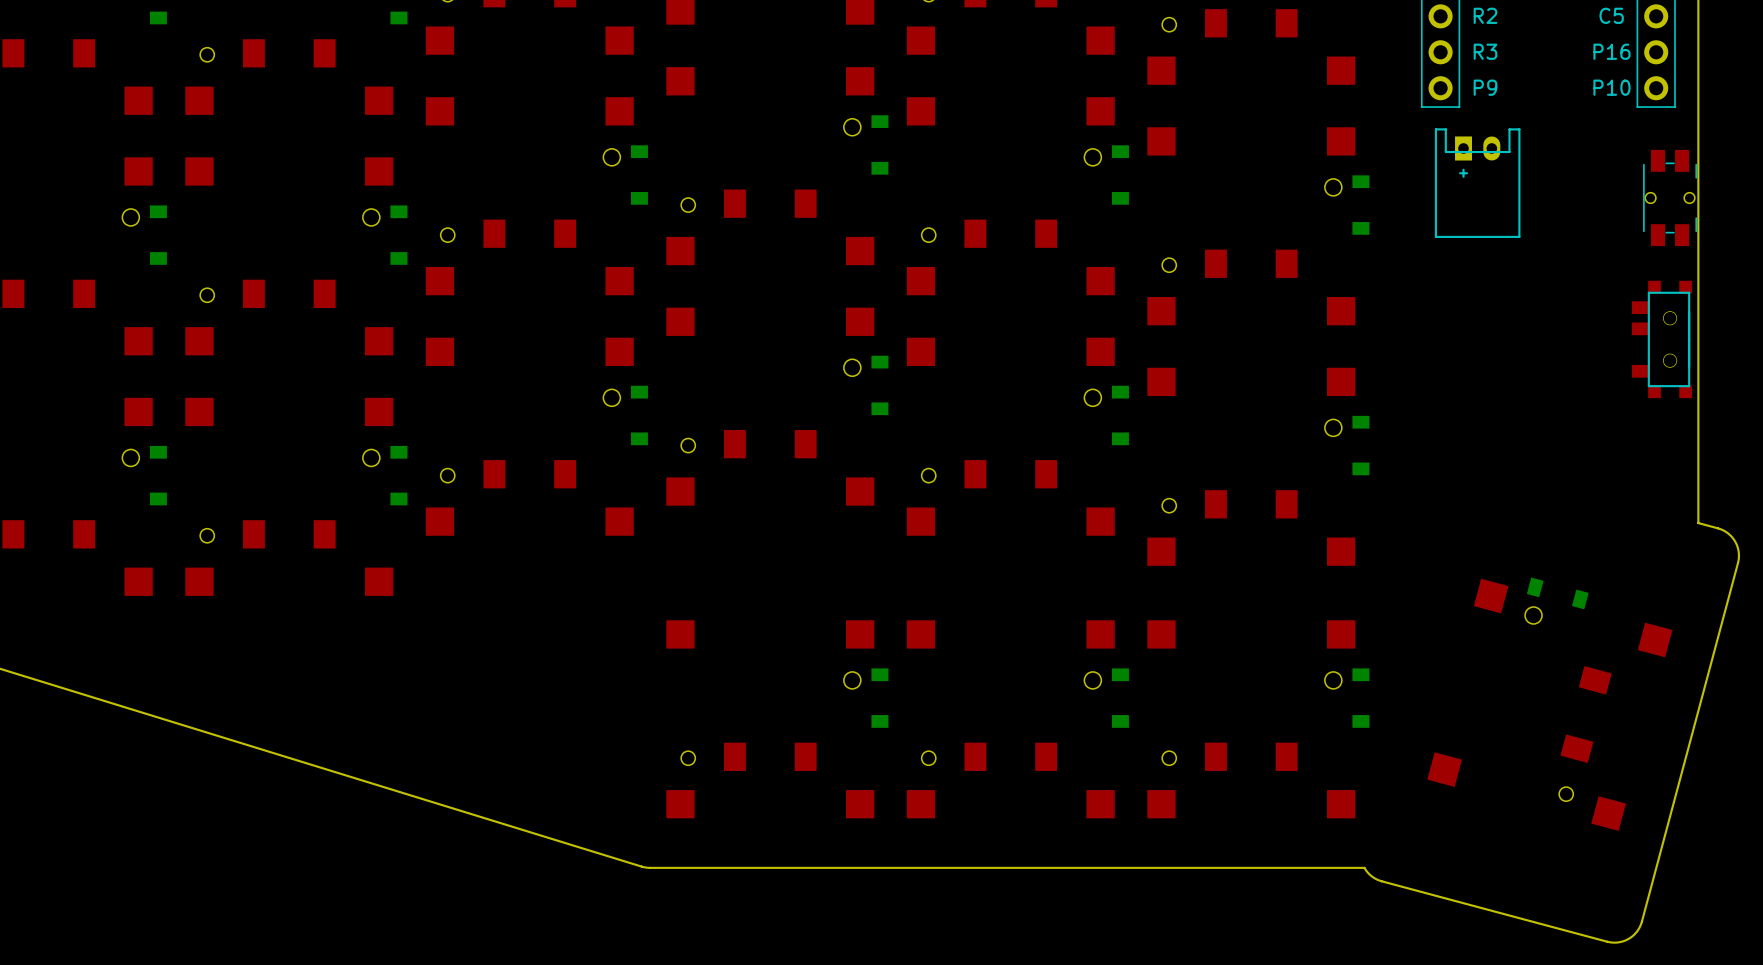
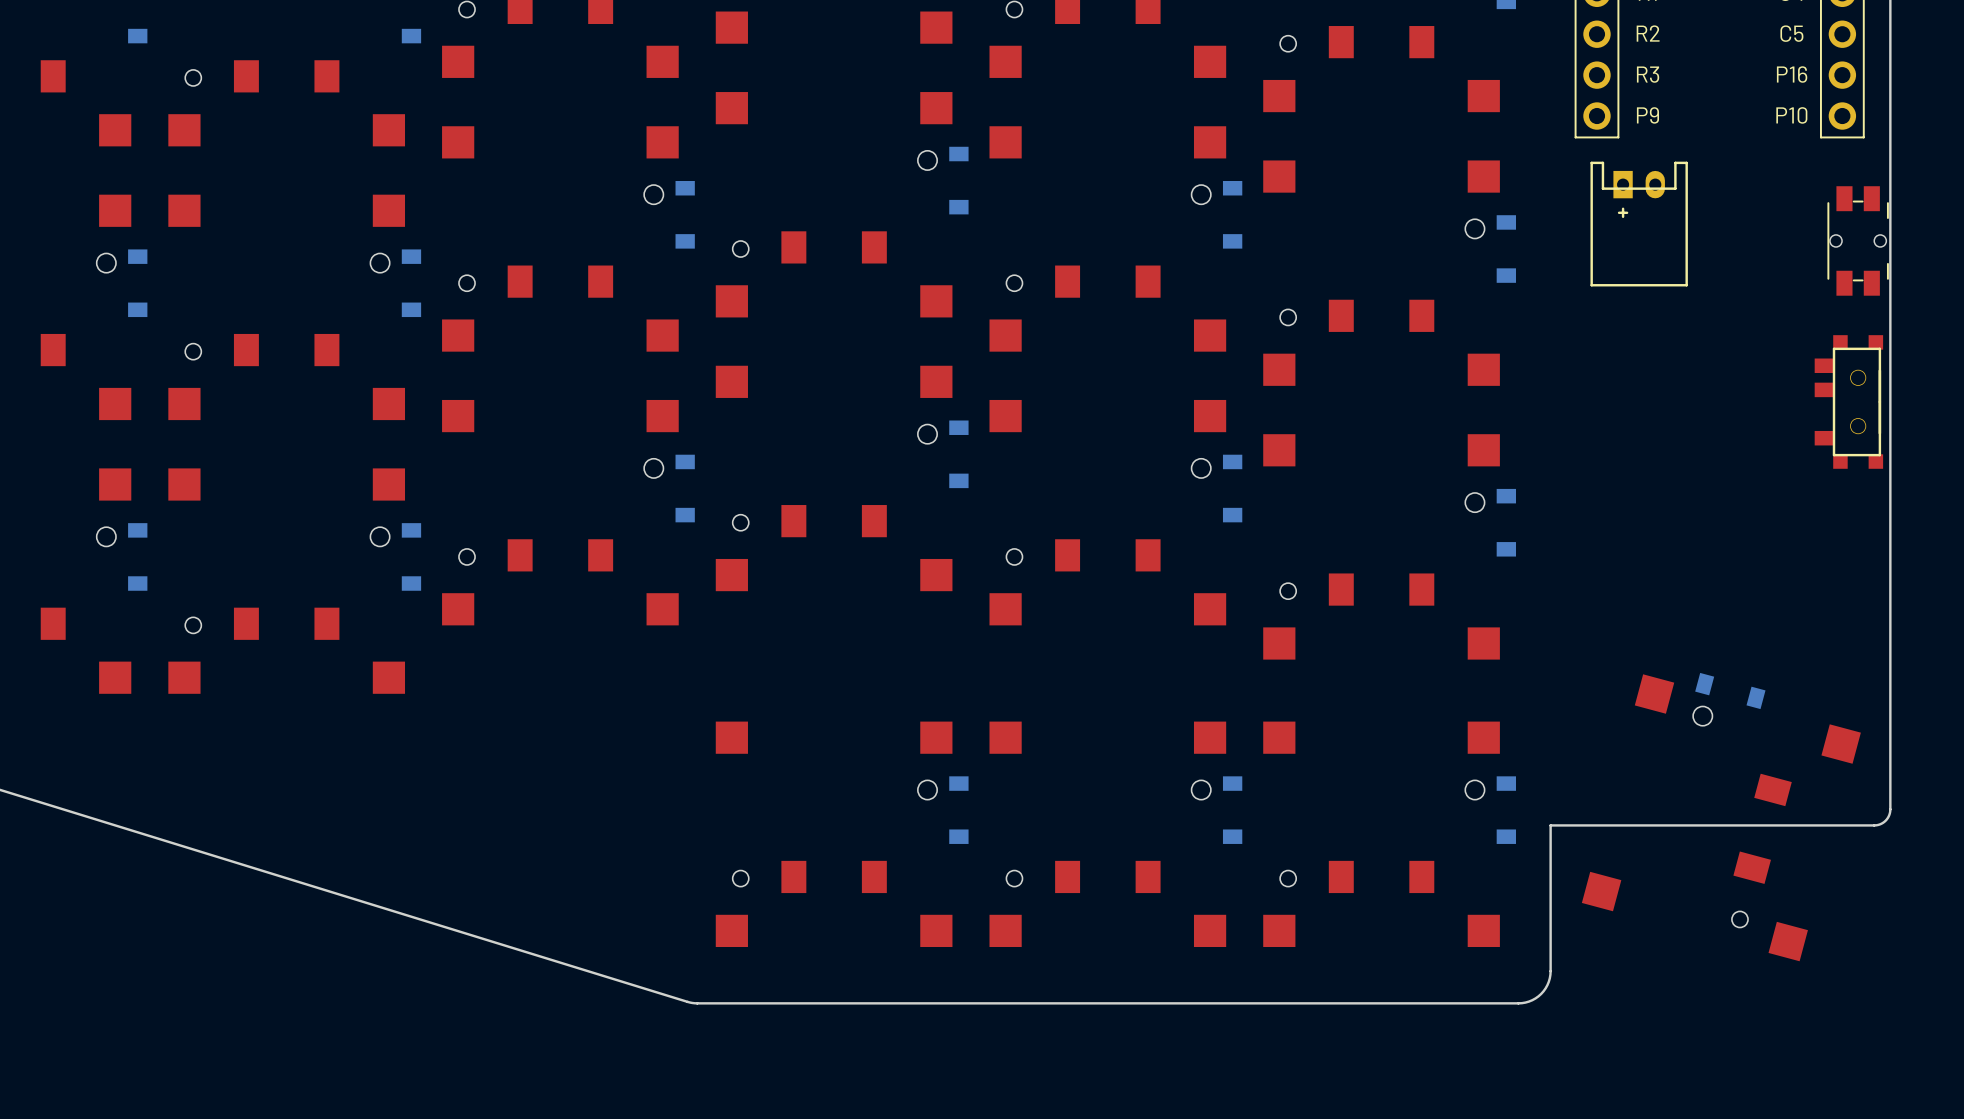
board edge: (1698, 523) (1721, 529) (1730, 535) (1736, 544) (1738, 559) (1641, 921) (1634, 934) (1621, 941) (1607, 941) (1381, 881) (1371, 876) (1364, 867) -> (1890, 610) (1890, 809) (1885, 820) (1874, 825) (1550, 825) (1549, 978) (1545, 988) (1535, 998) (1525, 1002) (1510, 1003)

